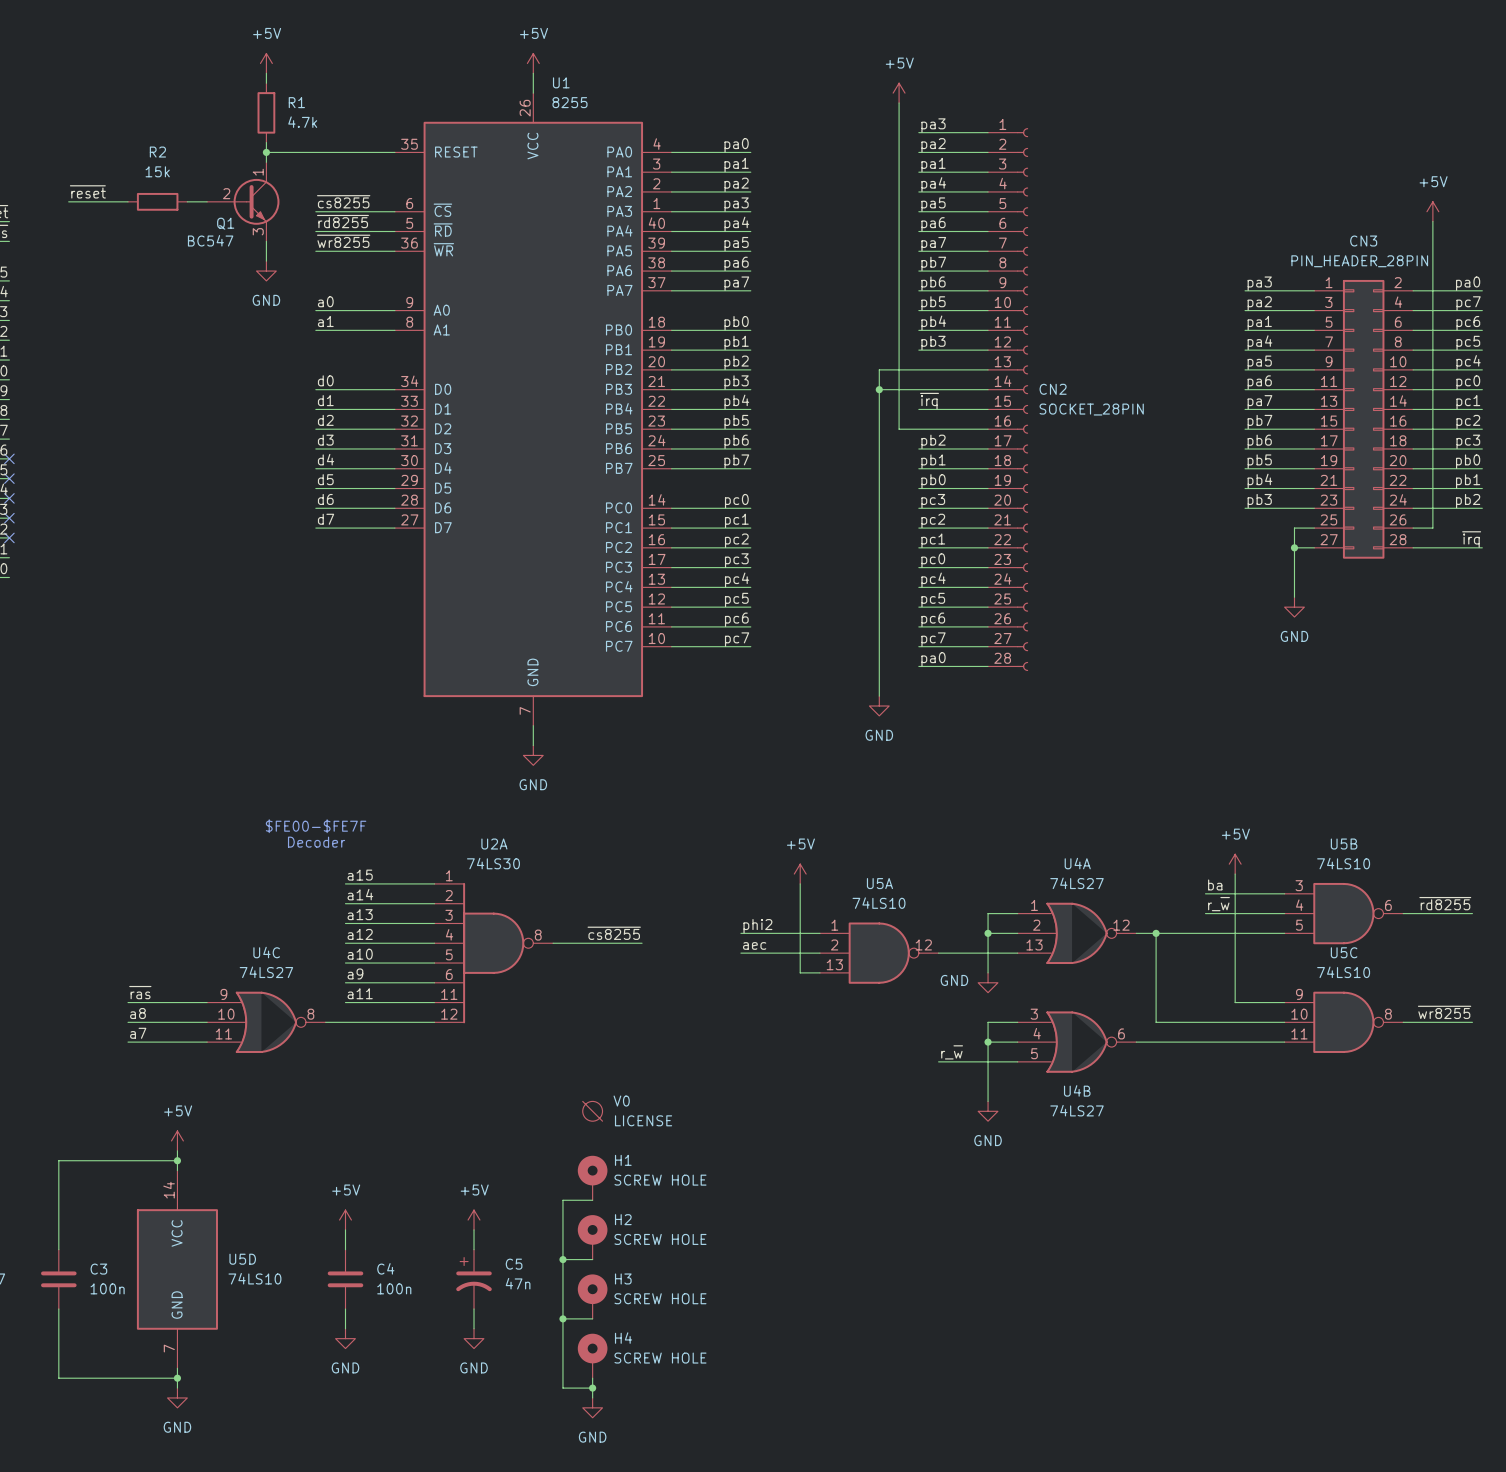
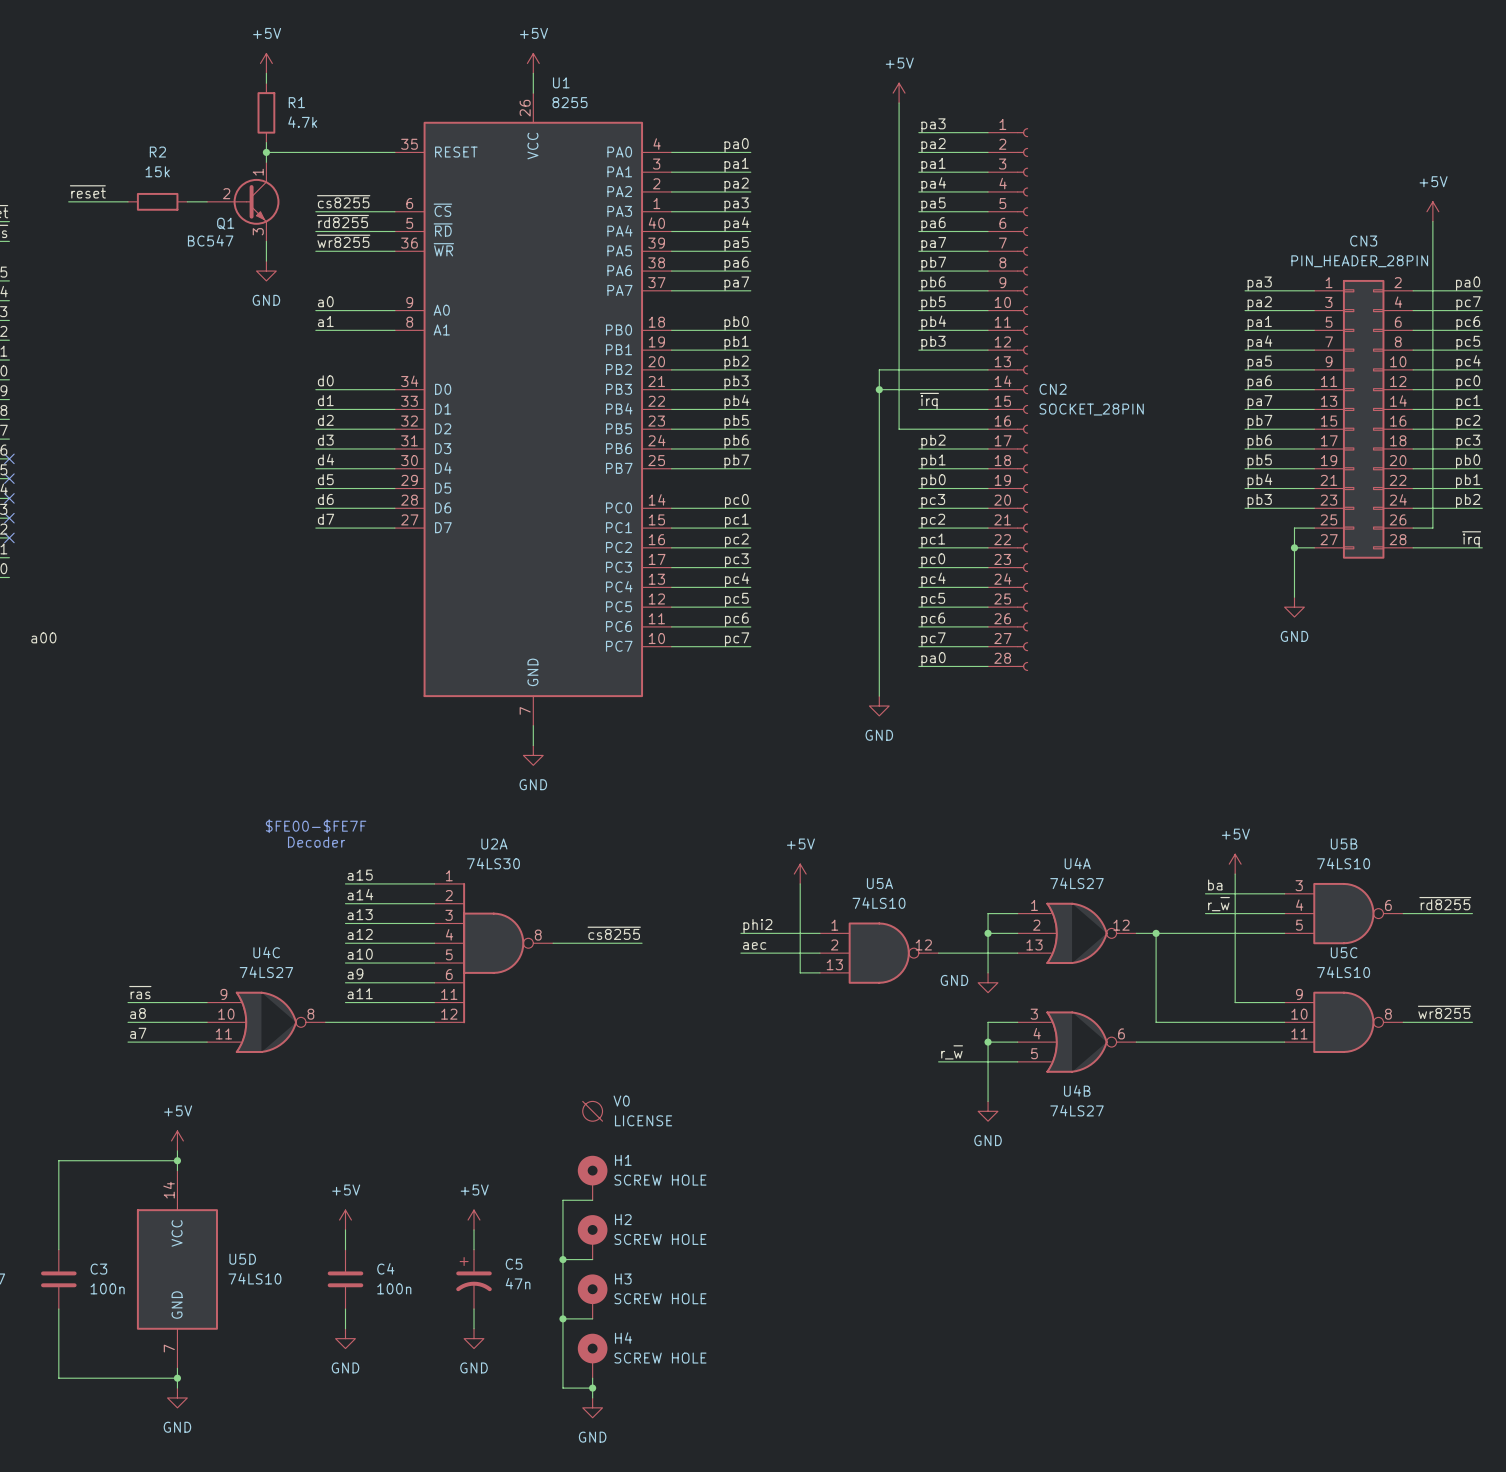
label: none -> a00 (43, 637)

